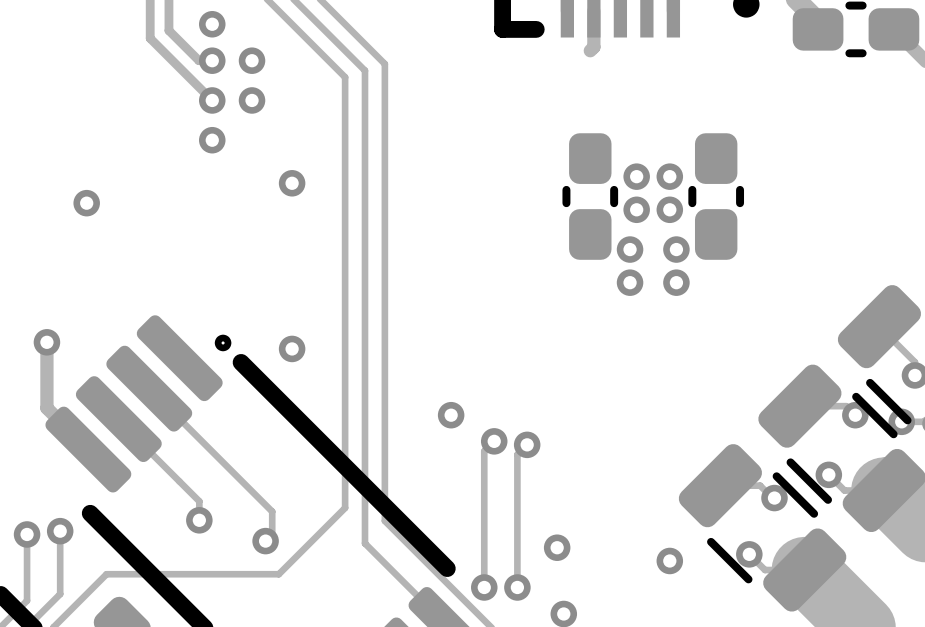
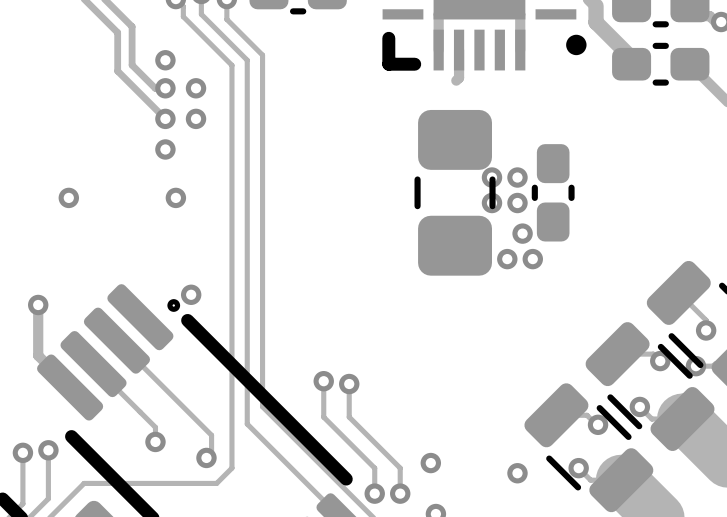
track: (338, 17) (384, 64) (384, 520) -> (262, 55) (262, 406) (298, 442)
track: (318, 24) (364, 70) (364, 543) -> (247, 60) (247, 424) (282, 459)
track: (298, 30) (345, 77) (345, 507) (298, 554) -> (231, 65) (231, 468)
part footprint: [562, 133, 619, 260] -> [414, 109, 496, 276]
via position: (292, 183) -> (175, 197)
via: (630, 249) -> none
via: (630, 282) -> none
via: none -> (507, 259)
via: (676, 282) -> none
via: none -> (532, 259)
via position: (292, 348) -> (191, 294)
via: (451, 415) -> none
via: none -> (323, 381)
track: (494, 441) (484, 451) (484, 554) -> (323, 381) (323, 417) (374, 468)
via: (494, 441) -> none
track: (527, 444) (517, 454) (517, 554) -> (349, 384) (349, 417) (400, 468)
via: (527, 444) -> none
via: none -> (349, 384)

